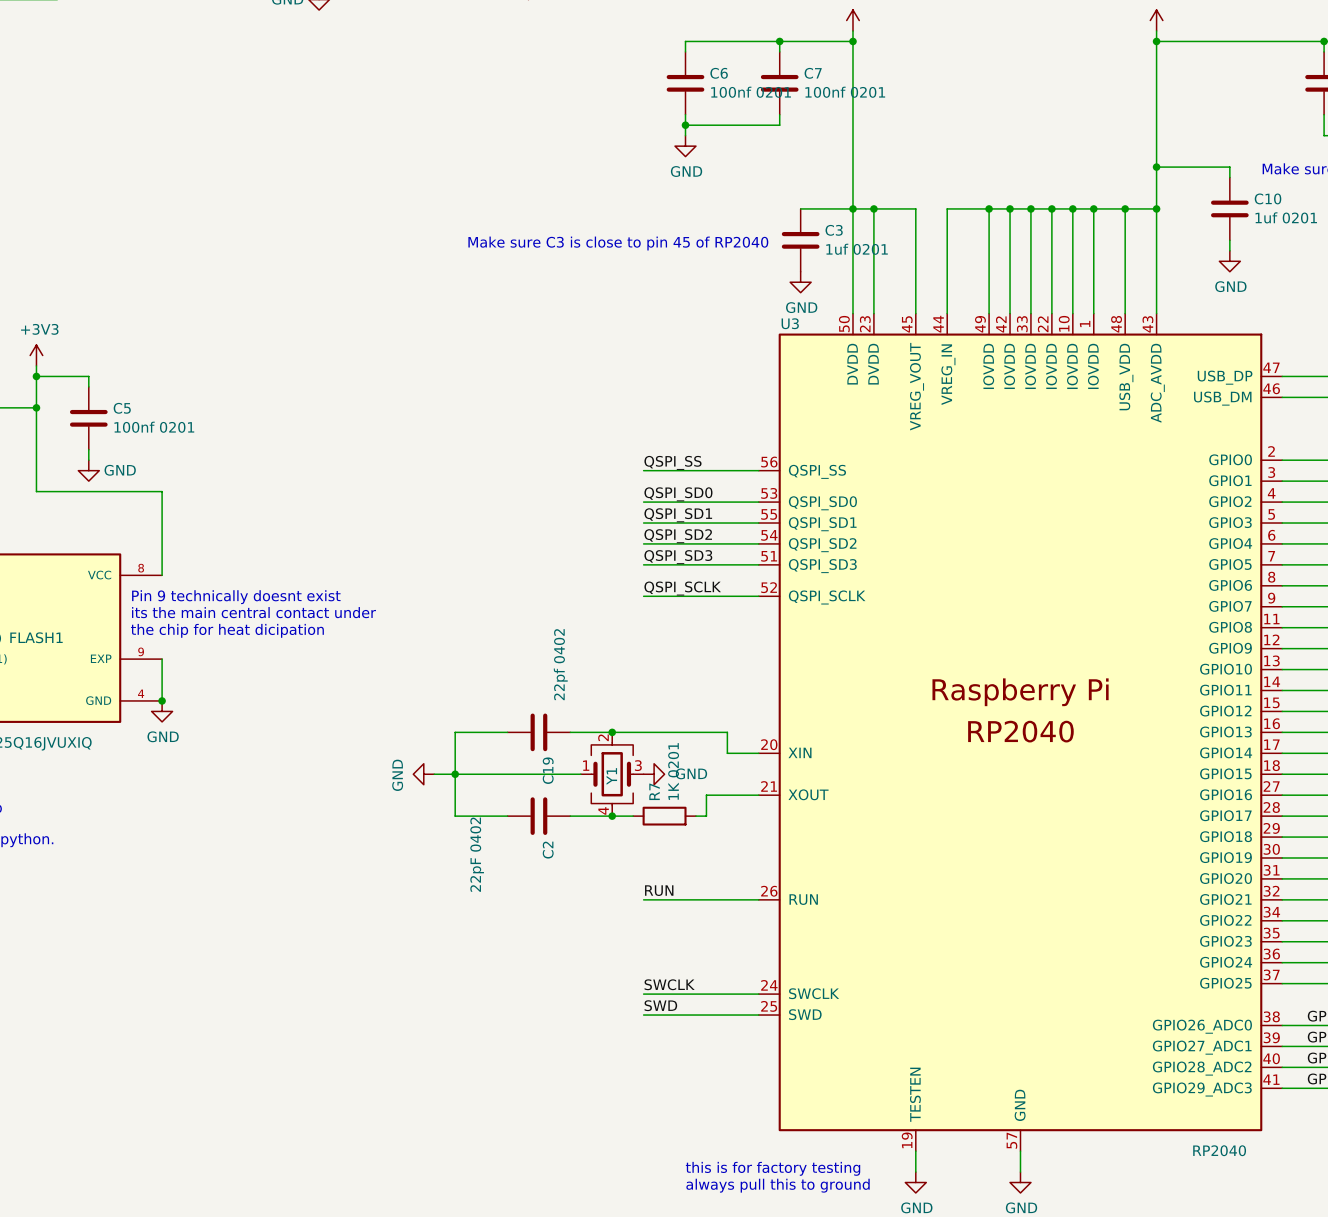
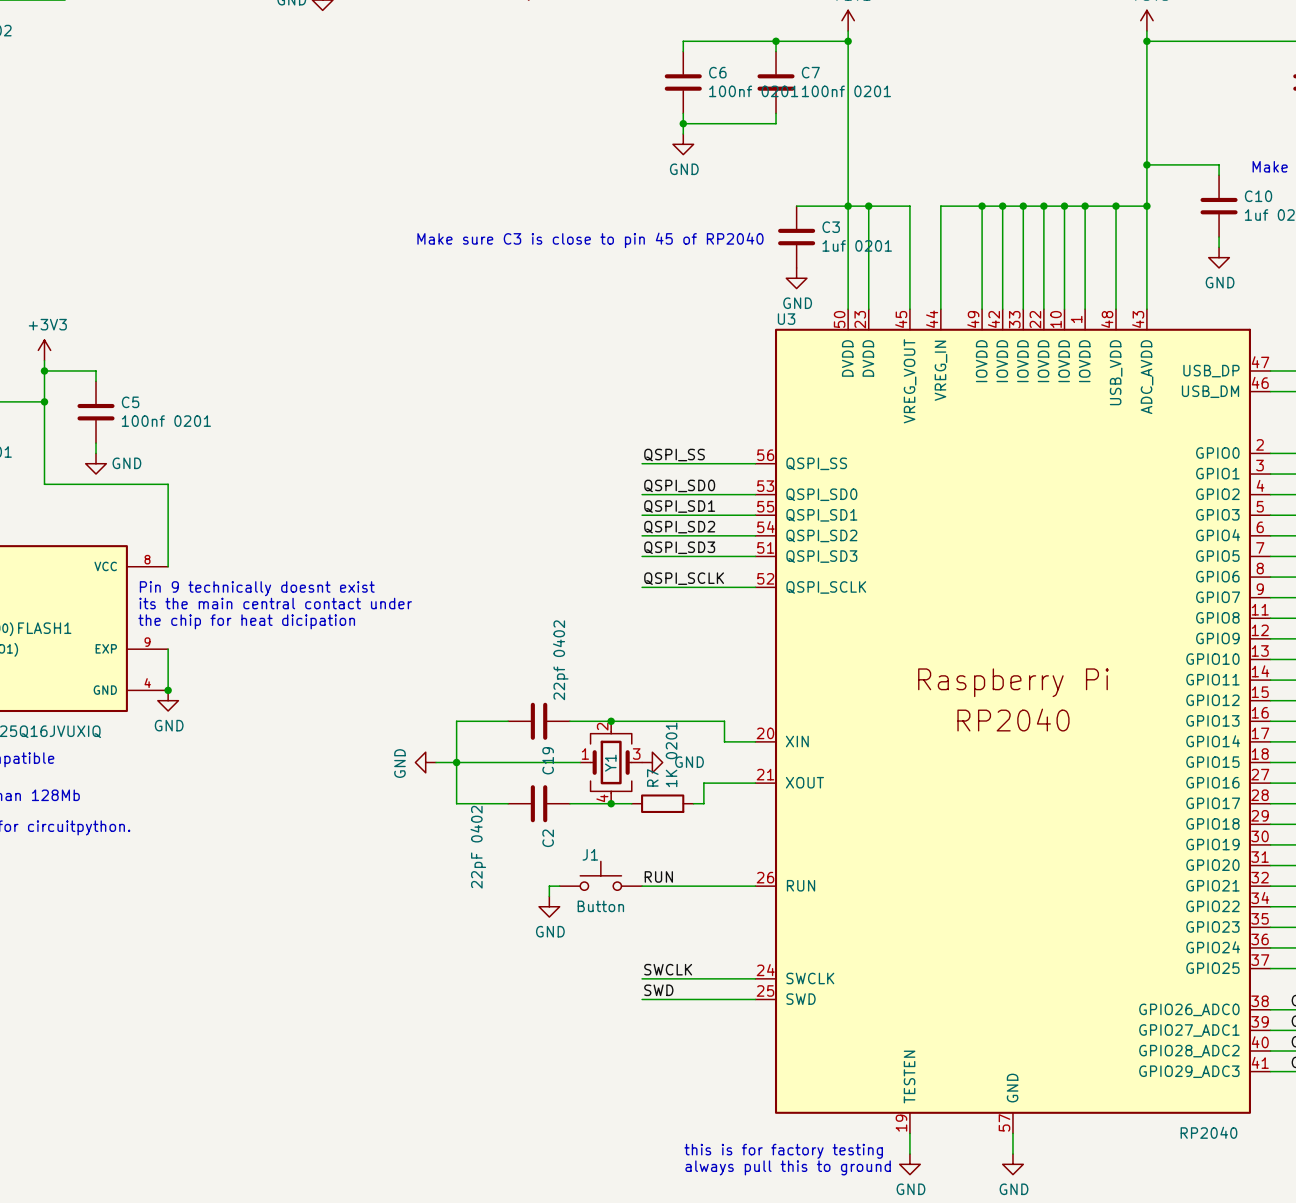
J1: none -> Button (600, 875)
wire: none -> (559, 886) (549, 886) (549, 896)
power symbol: none -> GND (549, 906)

